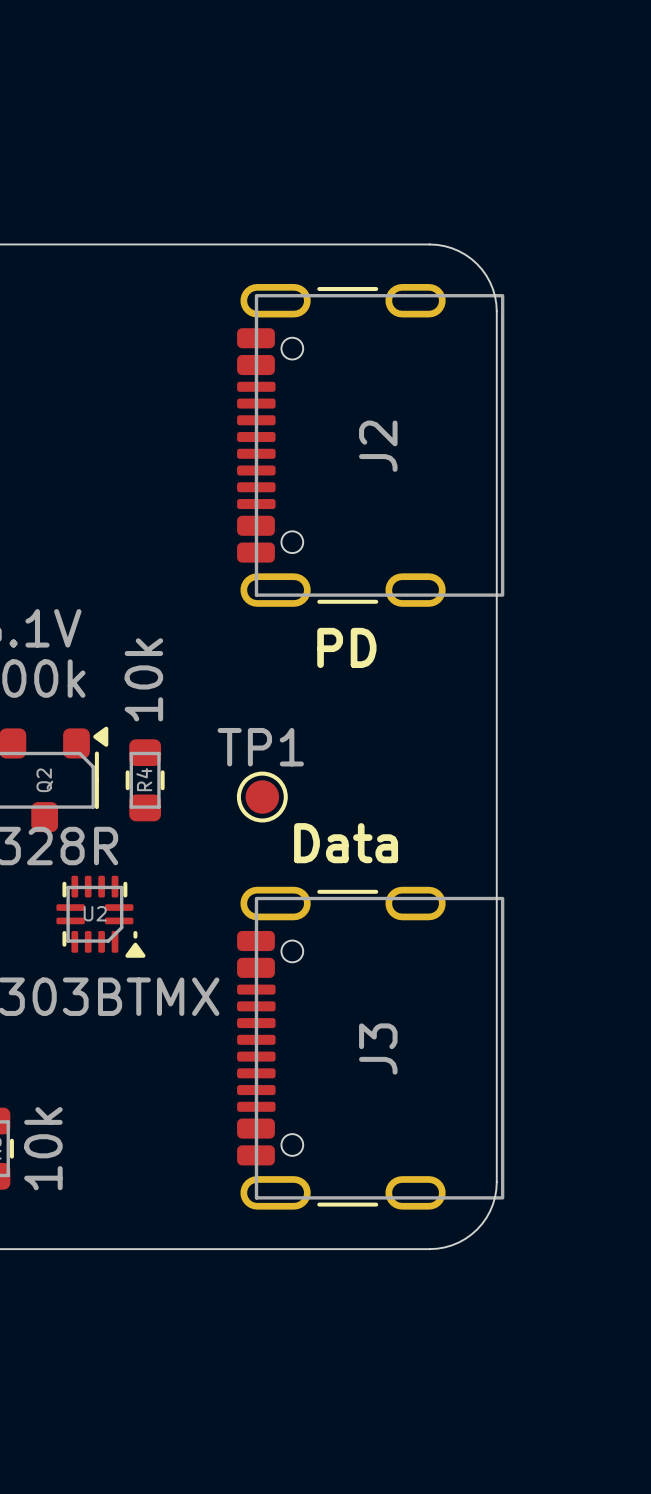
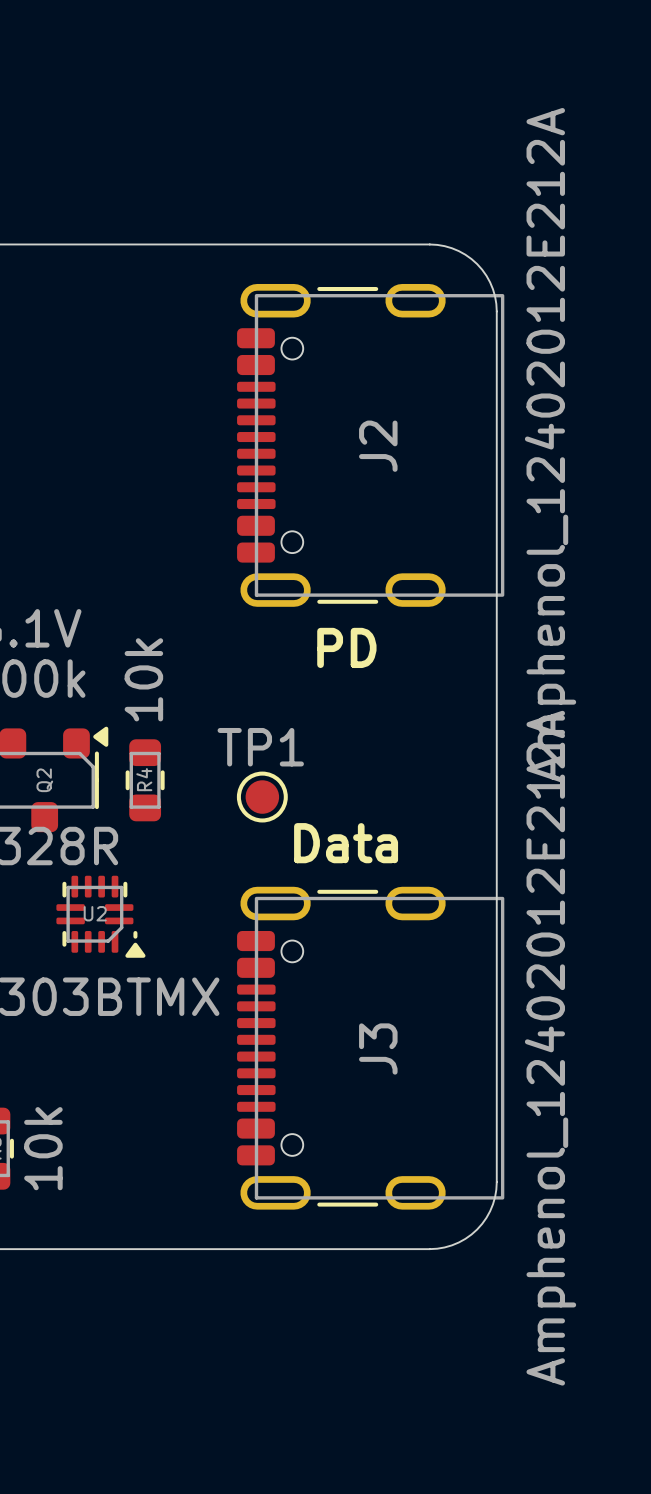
J2 value: none -> Amphenol_12402012E212A (550, 445)
J3 value: none -> Amphenol_12402012E212A (550, 1048)

